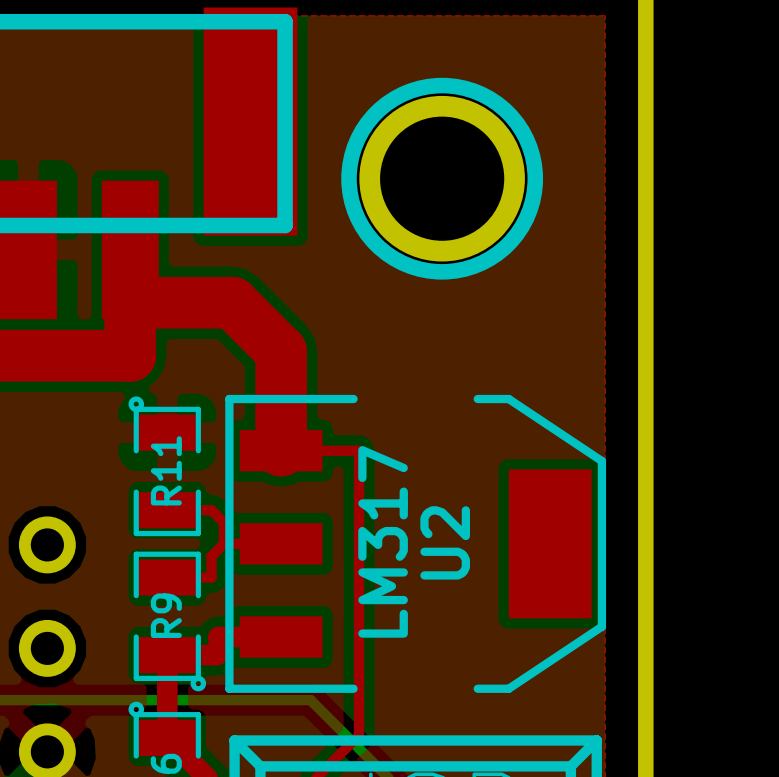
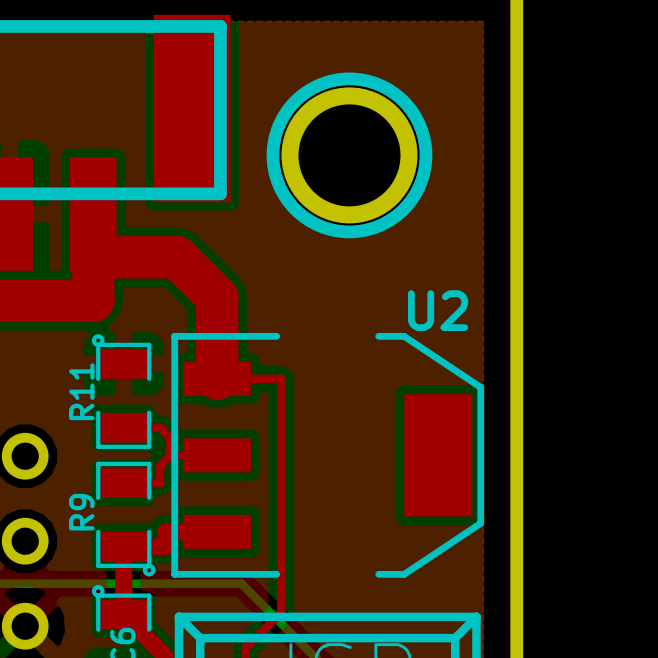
R11 name position: R11 (166, 470) -> R11 (81, 391)
U2 value: LM317 (383, 541) -> none
U2 name rotation: 0° (445, 542) -> 90° clockwise (438, 310)
U2 name position: U2 (445, 542) -> U2 (438, 310)
R9 name position: R9 (166, 615) -> R9 (81, 512)

